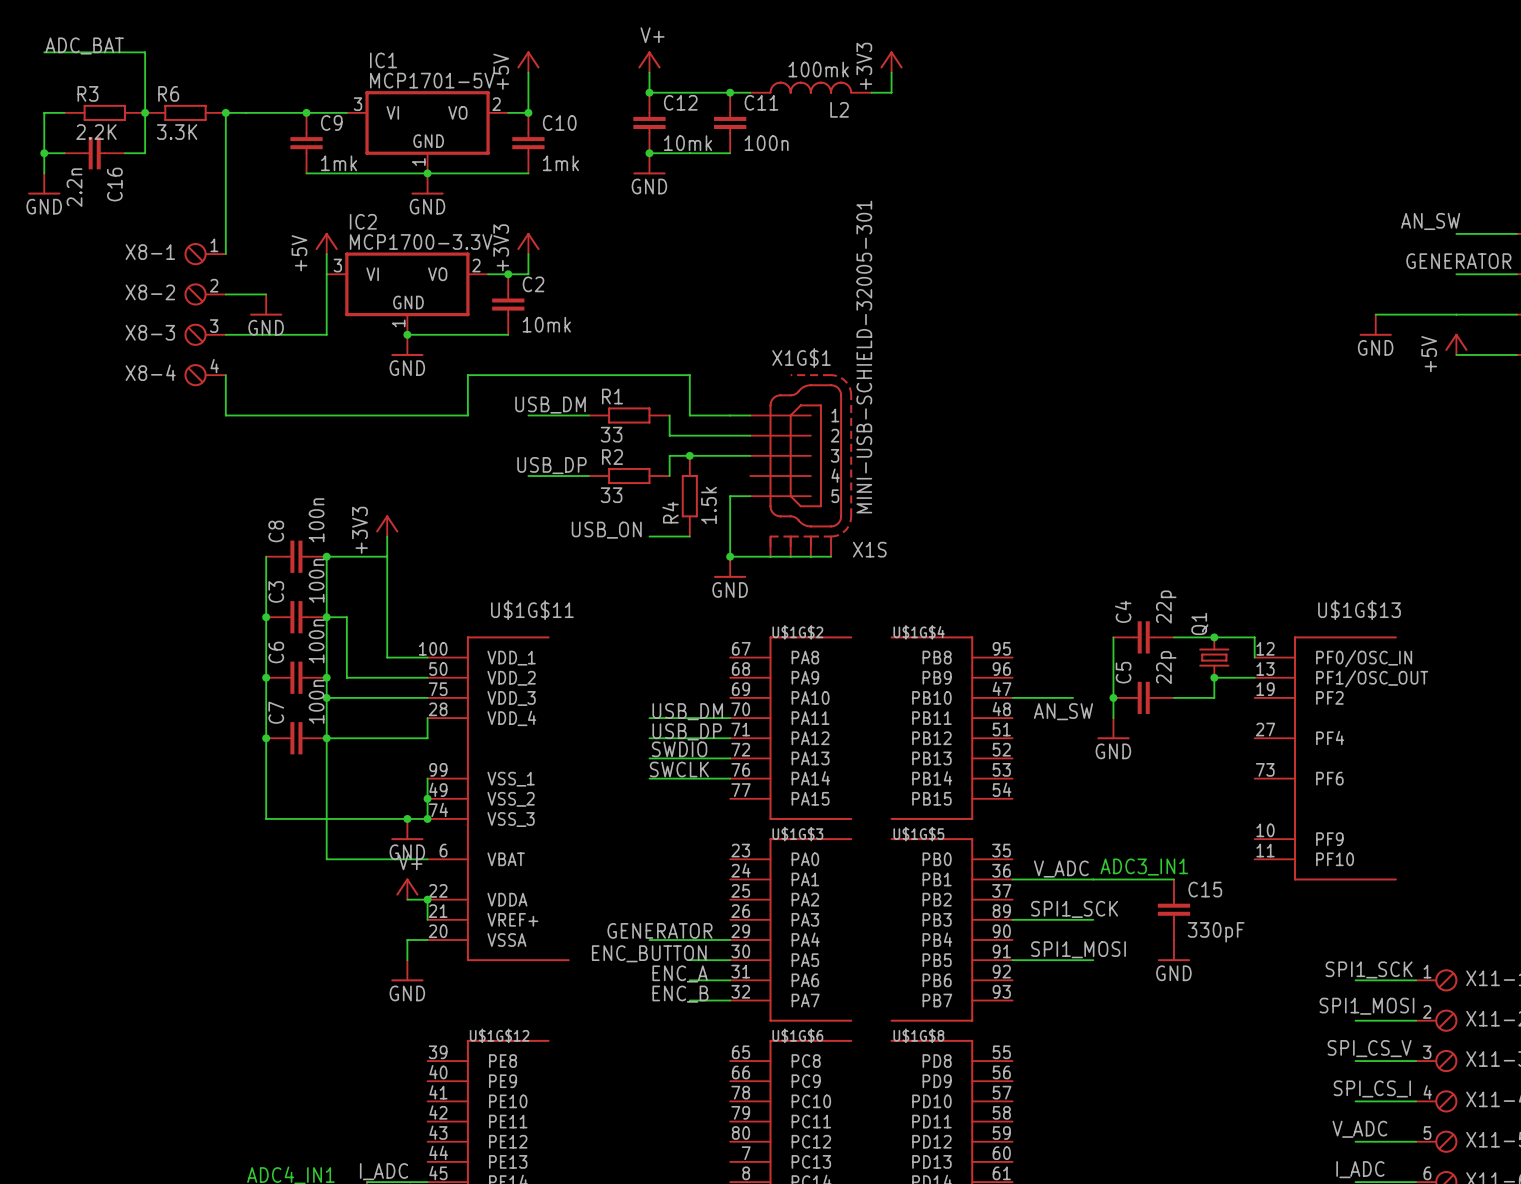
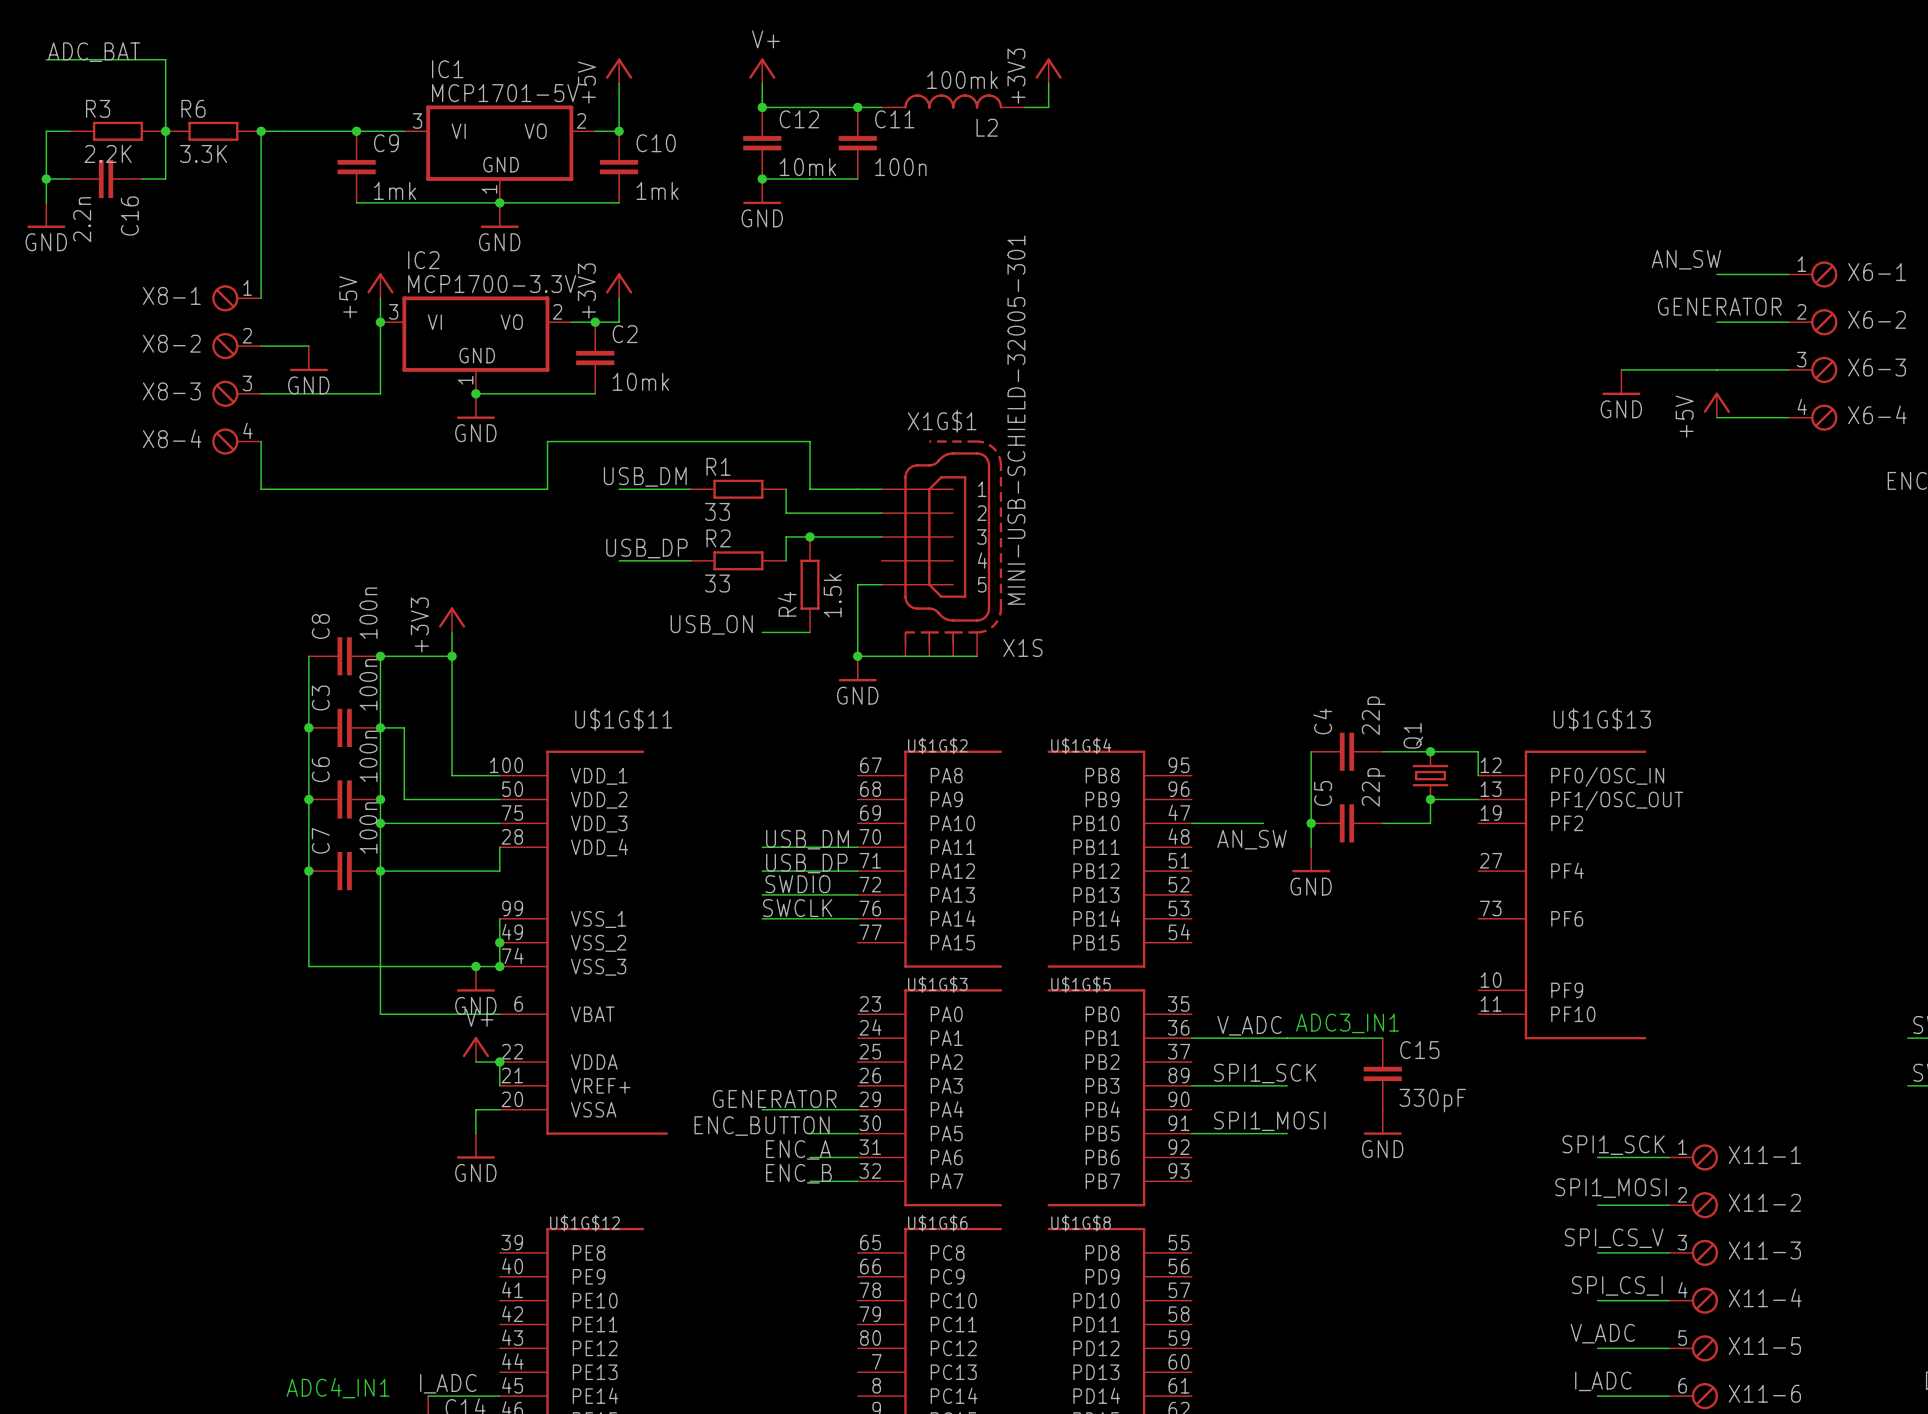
junction: none -> (380, 322)
junction: none -> (452, 656)

